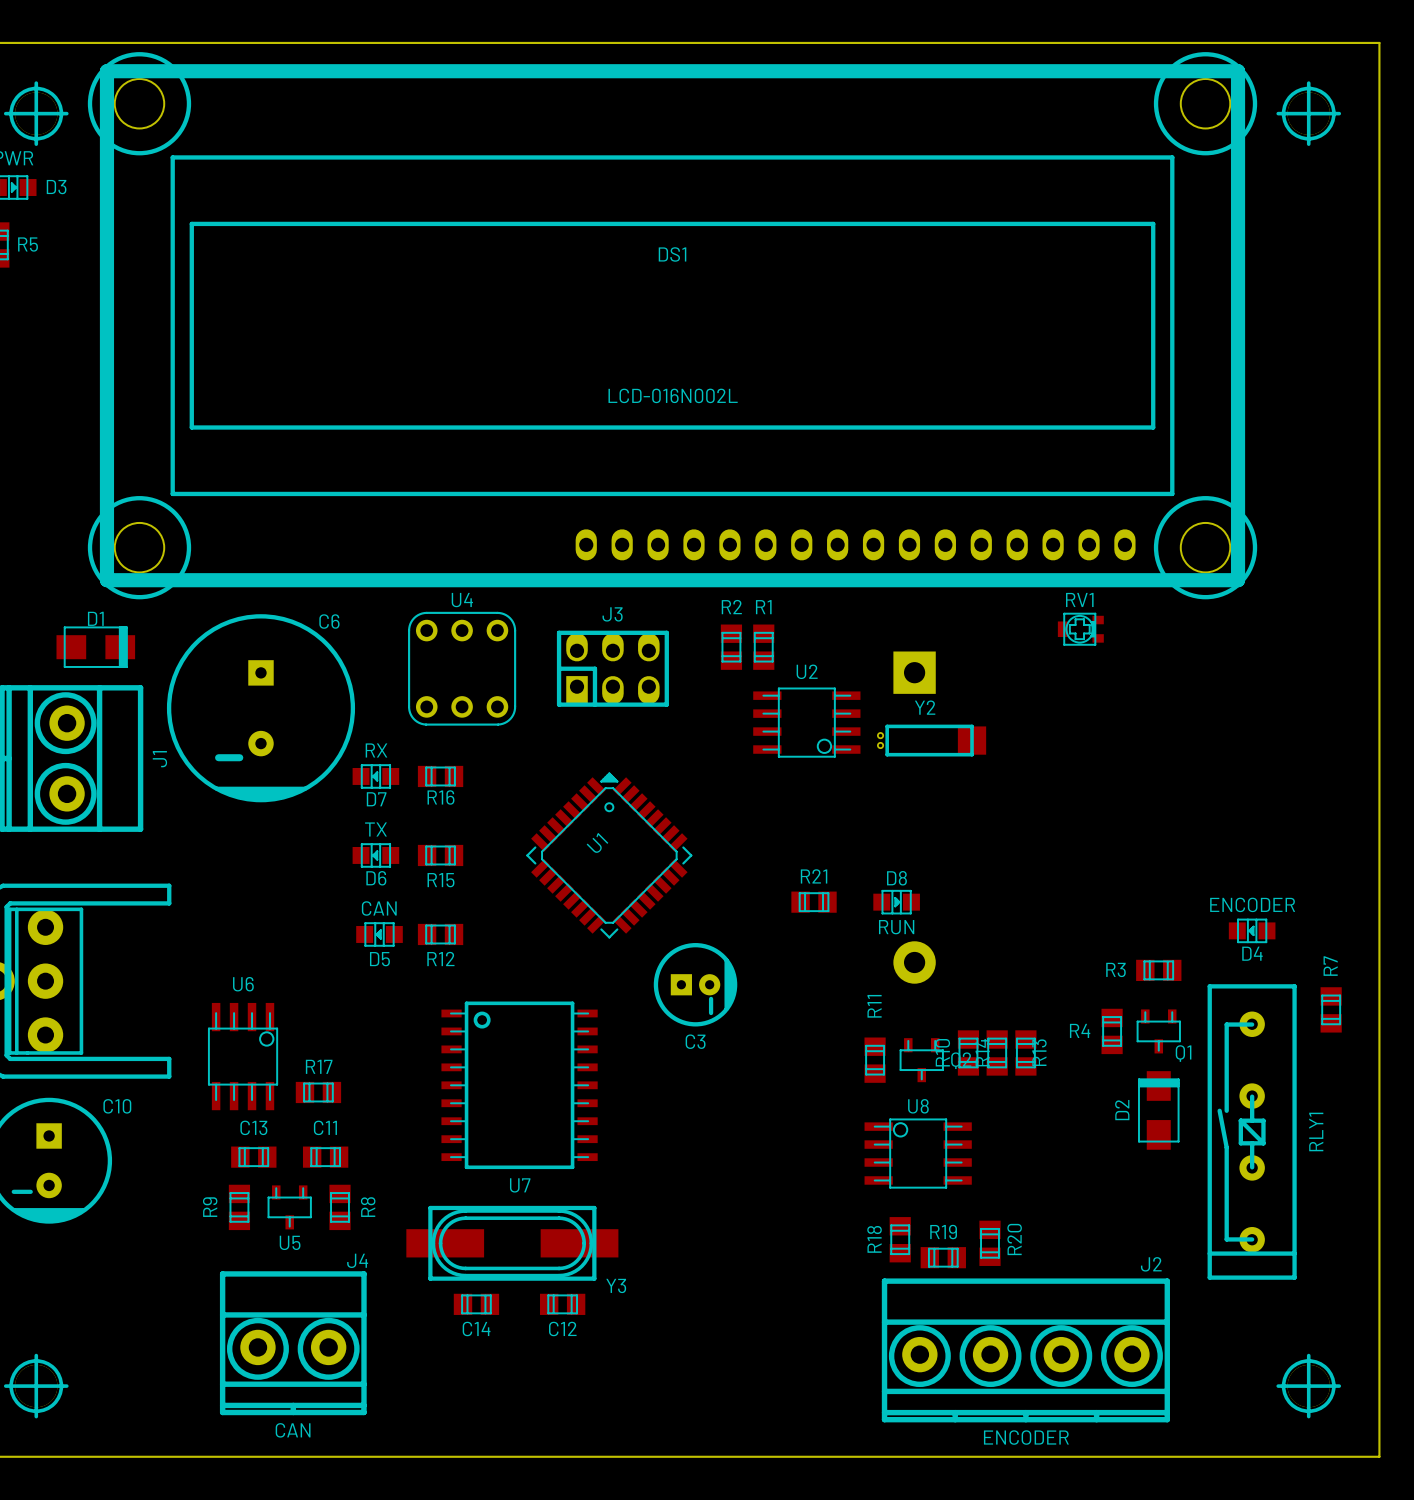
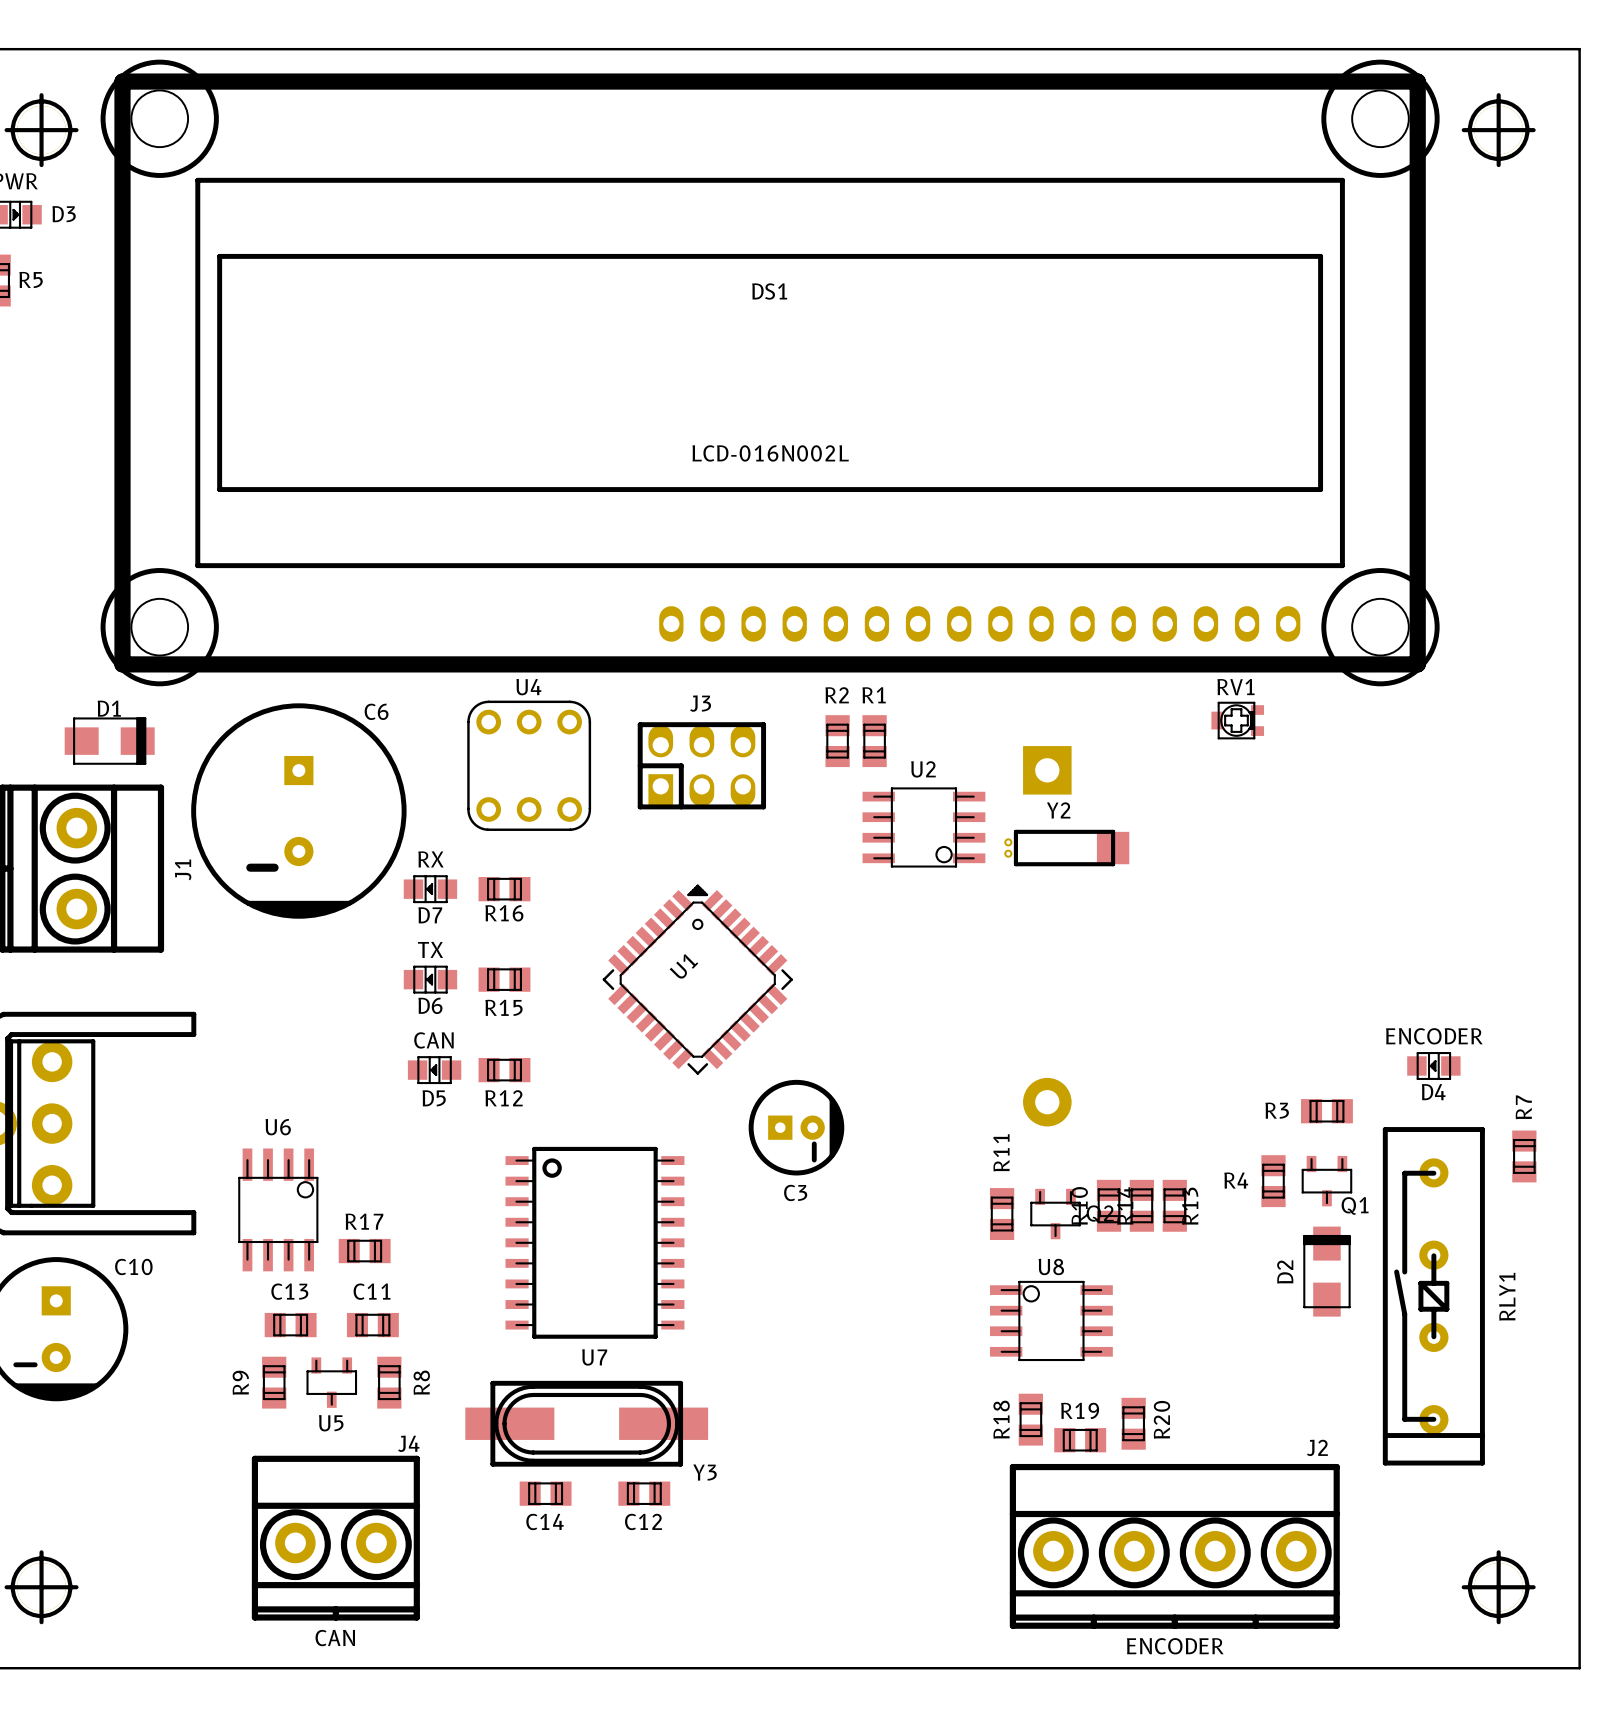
R21: (814, 902) -> none
D8: RUN (896, 902) -> none

